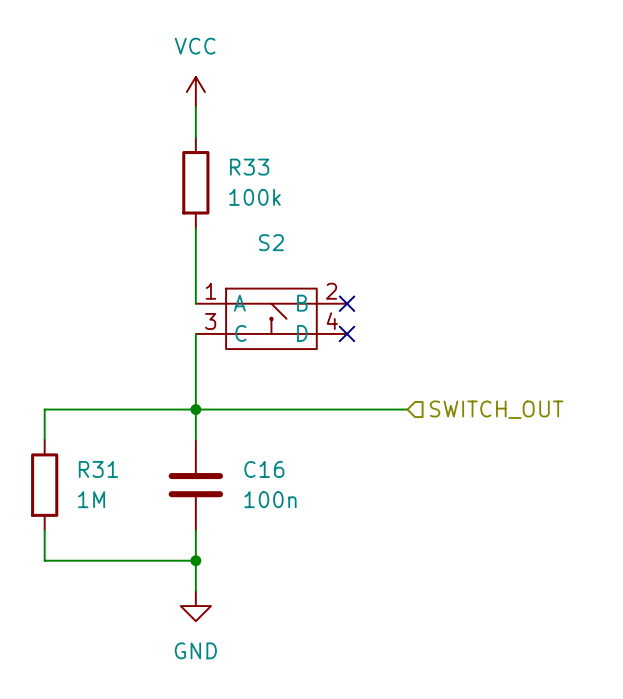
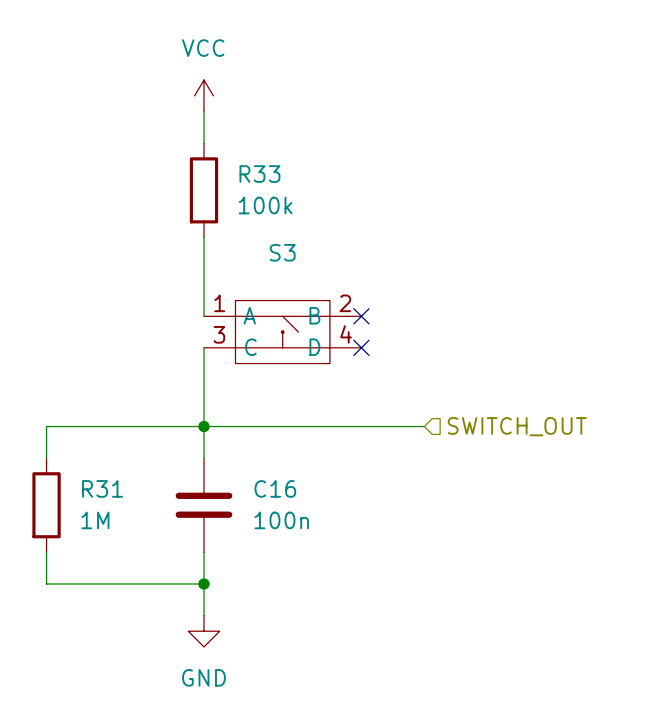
S2 name: S2 (271, 242) -> S3 (282, 252)

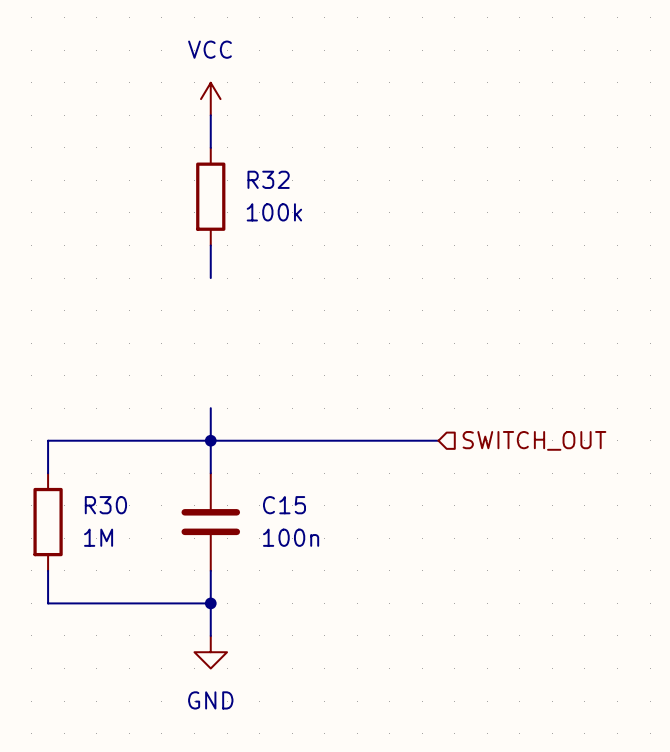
R33 name: R33 (259, 174) -> R32 (268, 179)
wire: (203, 269) (203, 316) -> none
no-connect mark: (361, 316) -> none
S3: (282, 332) -> none
wire: (203, 347) (203, 395) -> none
no-connect mark: (361, 347) -> none
R31 name: R31 (102, 488) -> R30 (105, 505)
C16 name: C16 (275, 488) -> C15 (284, 505)

